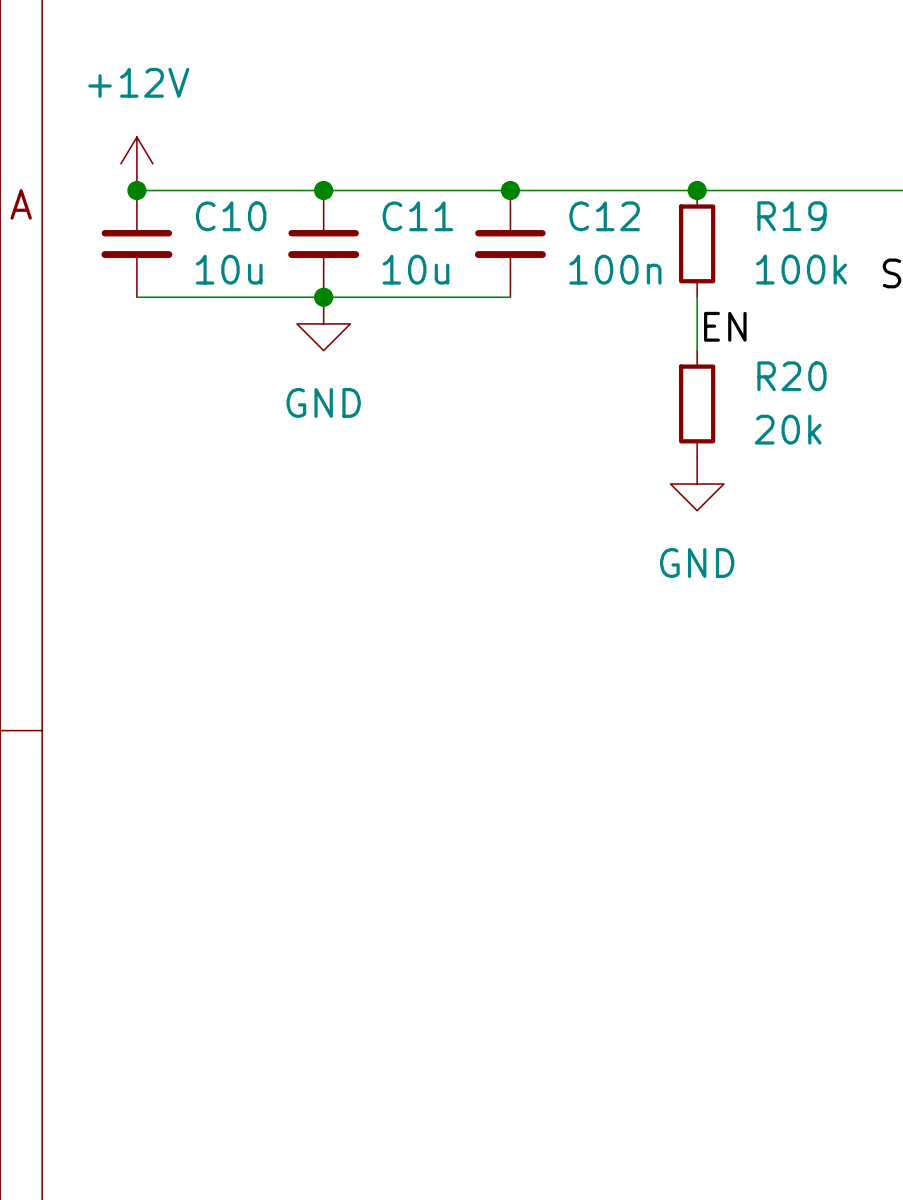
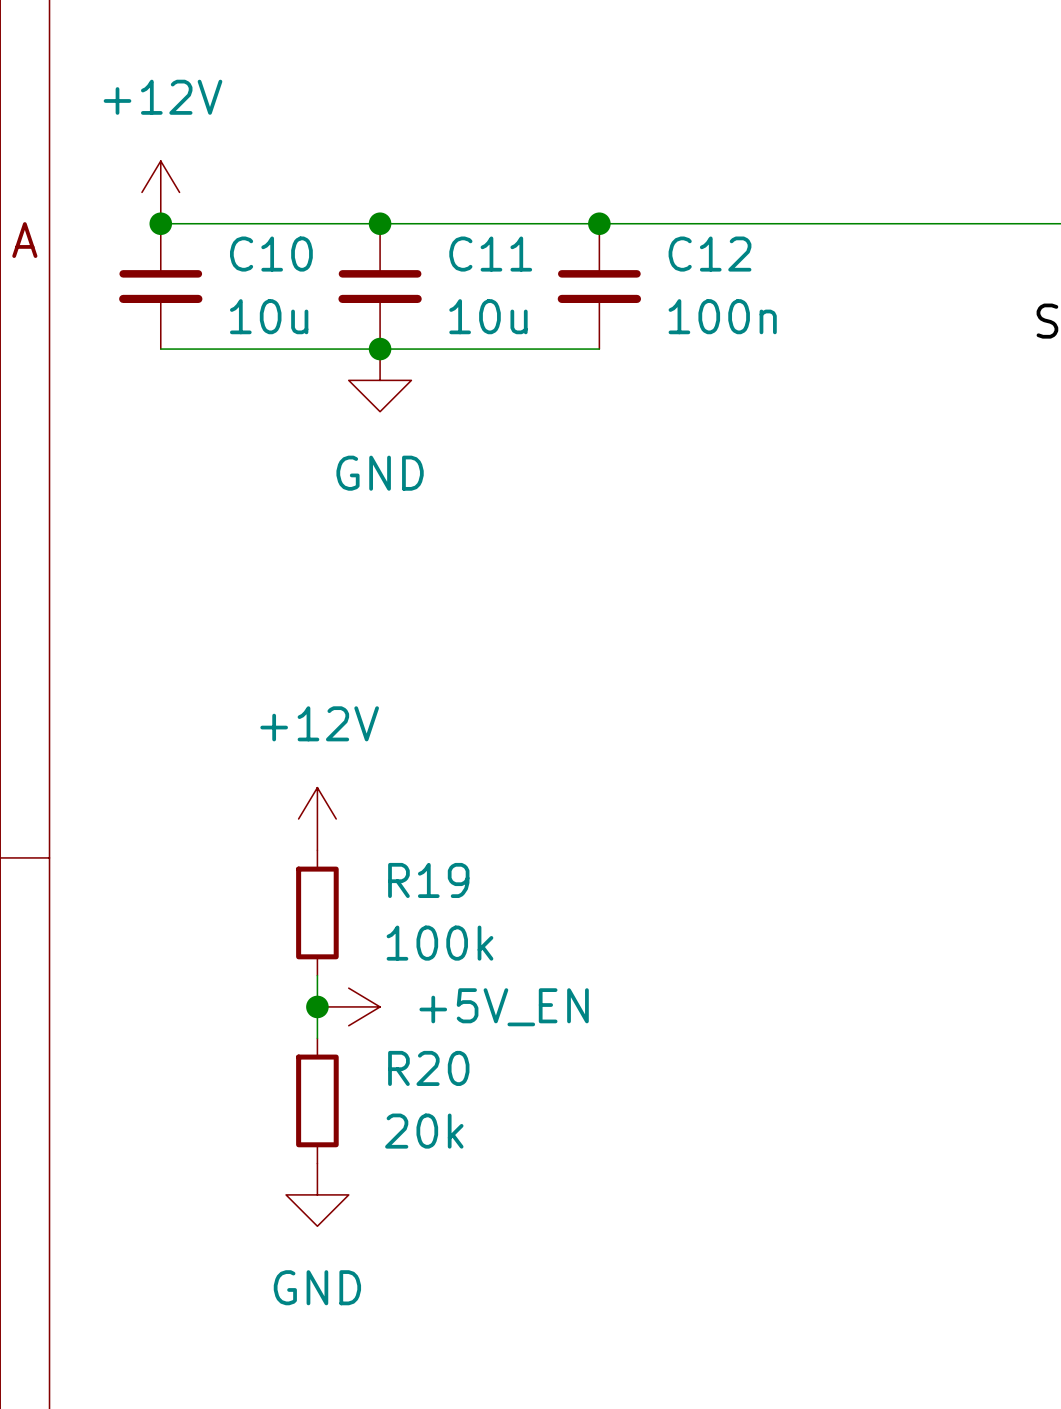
junction: (697, 190) -> none
R19 position: (697, 243) -> (317, 912)
wire: (697, 297) (697, 350) -> none
label: EN (725, 326) -> none
R20 position: (697, 403) -> (317, 1100)
power symbol: GND (697, 483) -> none
power symbol: none -> +12V (317, 818)
wire: none -> (317, 975) (317, 1038)
junction: none -> (317, 1006)
power symbol: none -> +5V_EN (348, 1006)
power symbol: none -> GND (317, 1194)

